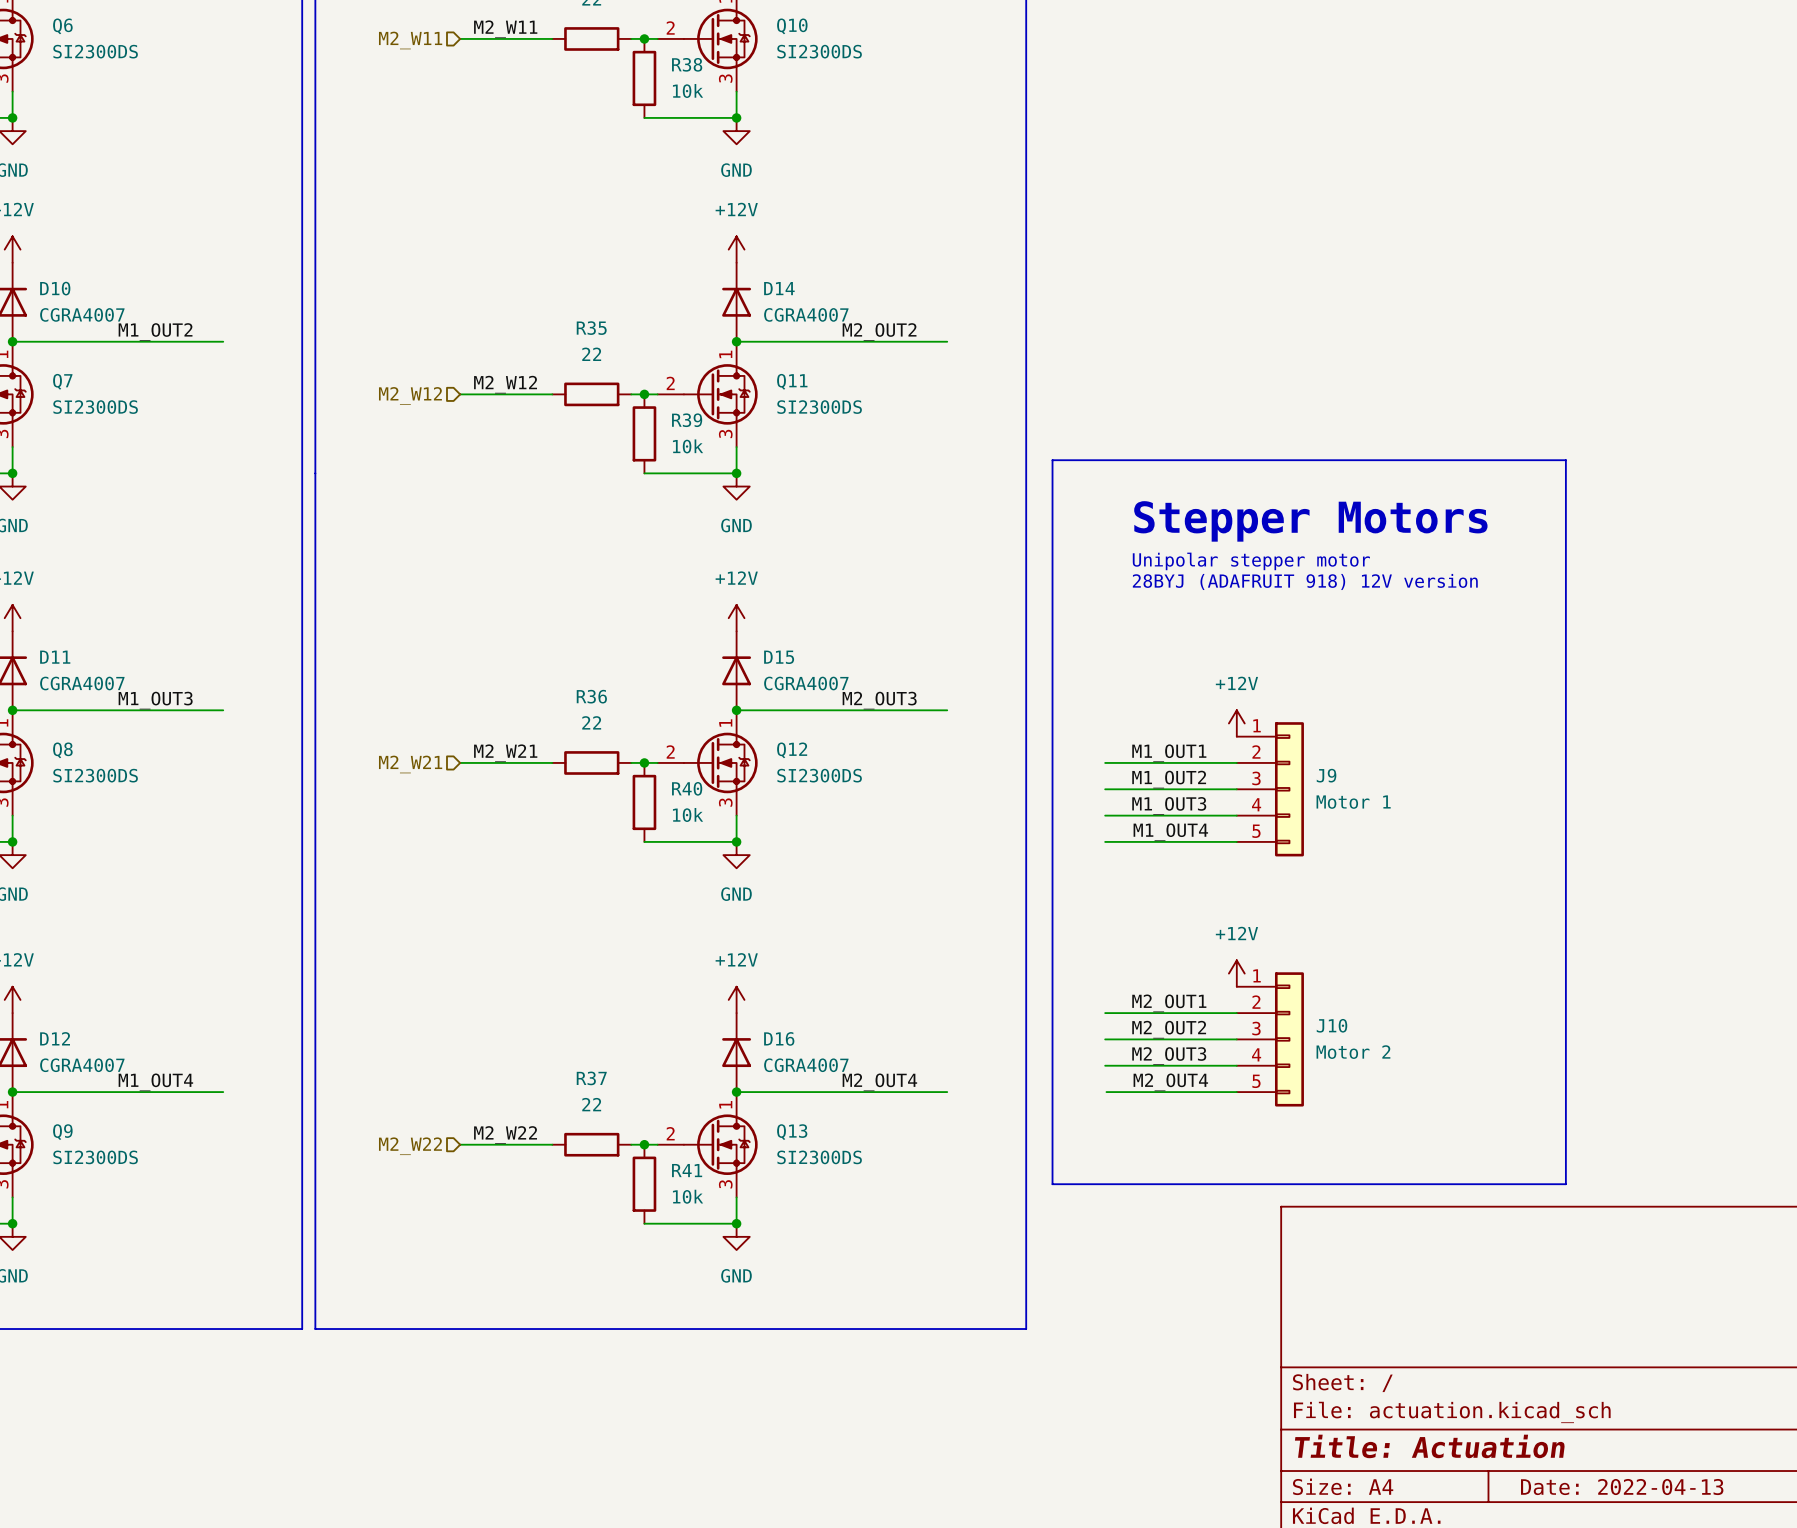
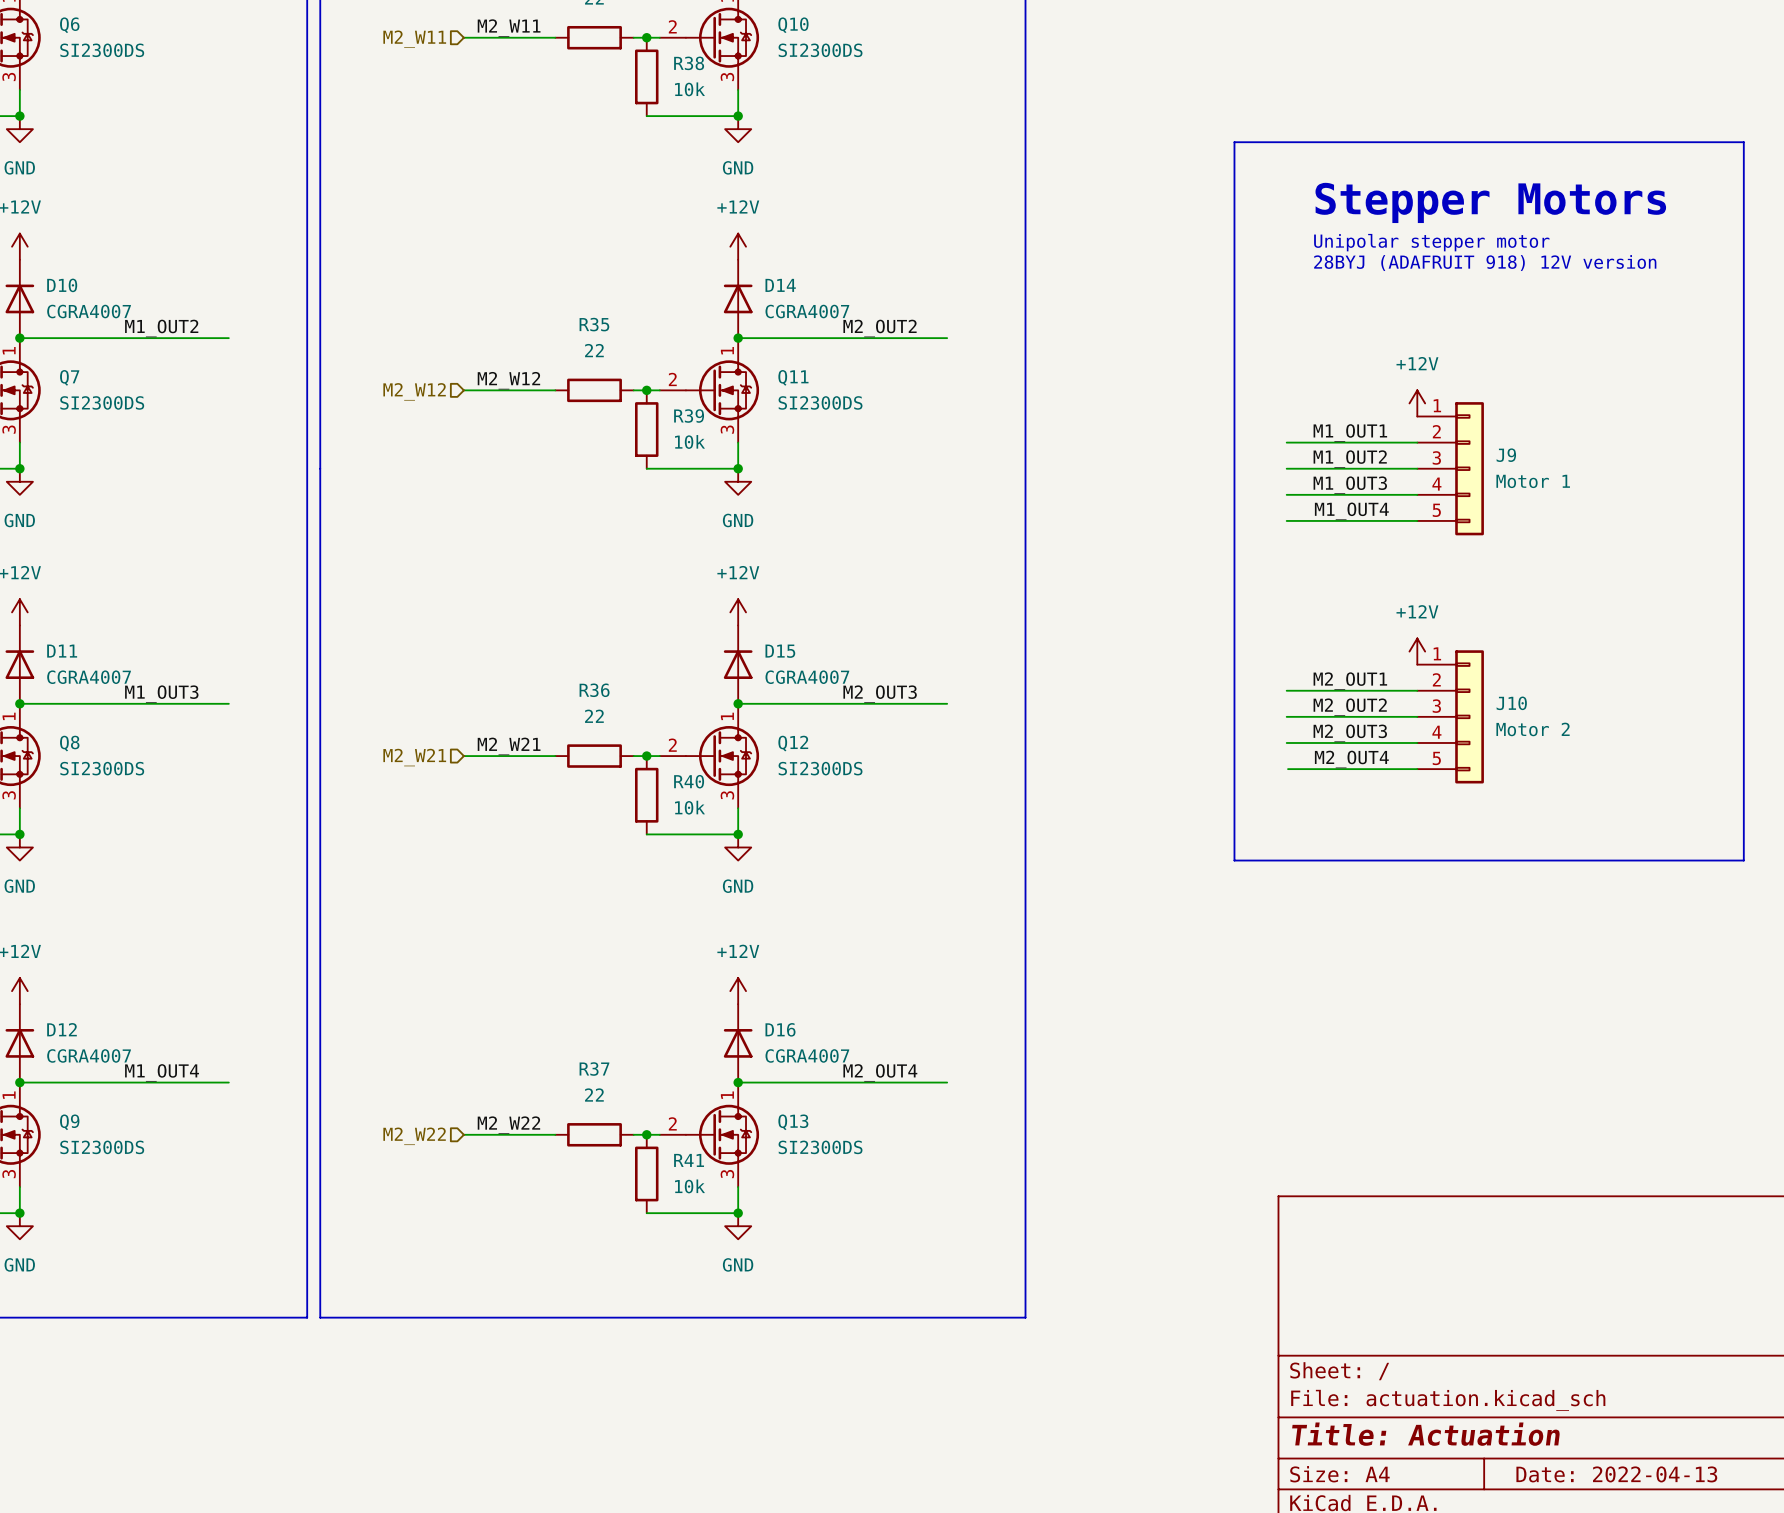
line: none -> (1234, 142) (1743, 142) (1743, 860) (1234, 860) (1234, 142)
text: none -> Stepper Motors (1490, 202)
text: none -> Unipolar stepper motor (1431, 242)
text: none -> 28BYJ (ADAFRUIT 918) 12V version (1485, 263)
power symbol: none -> +12V (1417, 403)
label: none -> M1_OUT1 (1350, 432)
wire: none -> (1286, 442) (1417, 442)
line: (1052, 460) (1565, 460) (1565, 1184) (1052, 1184) (1052, 460) -> none
label: none -> M1_OUT2 (1350, 459)
wire: none -> (1286, 468) (1417, 468)
label: none -> M1_OUT3 (1350, 485)
wire: none -> (1286, 494) (1417, 494)
label: none -> M1_OUT4 (1351, 511)
text: Stepper Motors (1310, 521) -> none
wire: none -> (1286, 520) (1417, 520)
text: Unipolar stepper motor (1251, 561) -> none
text: 28BYJ (ADAFRUIT 918) 12V version (1305, 581) -> none
power symbol: none -> +12V (1417, 651)
label: none -> M2_OUT1 (1350, 681)
label: none -> M2_OUT2 (1350, 707)
power symbol: +12V (1236, 723) -> none
label: none -> M2_OUT3 (1350, 733)
label: M1_OUT1 (1169, 753) -> none
wire: (1105, 762) (1236, 762) -> (1286, 690) (1417, 690)
label: none -> M2_OUT4 (1351, 759)
wire: none -> (1288, 769) (1417, 769)
label: M1_OUT2 (1169, 779) -> none
wire: (1105, 789) (1236, 789) -> (1286, 716) (1417, 716)
J9 position: (1270, 789) -> (1450, 468)
label: M1_OUT3 (1169, 805) -> none
wire: (1105, 815) (1236, 815) -> (1286, 742) (1417, 742)
label: M1_OUT4 (1170, 832) -> none
wire: (1105, 841) (1236, 841) -> none
power symbol: +12V (1236, 973) -> none
label: M2_OUT1 (1169, 1003) -> none
wire: (1105, 1013) (1236, 1013) -> none
label: M2_OUT2 (1169, 1029) -> none
wire: (1105, 1039) (1236, 1039) -> none
J10 position: (1270, 1039) -> (1450, 716)
label: M2_OUT3 (1169, 1056) -> none
wire: (1105, 1065) (1236, 1065) -> none
label: M2_OUT4 (1170, 1082) -> none
wire: (1106, 1092) (1236, 1092) -> none

